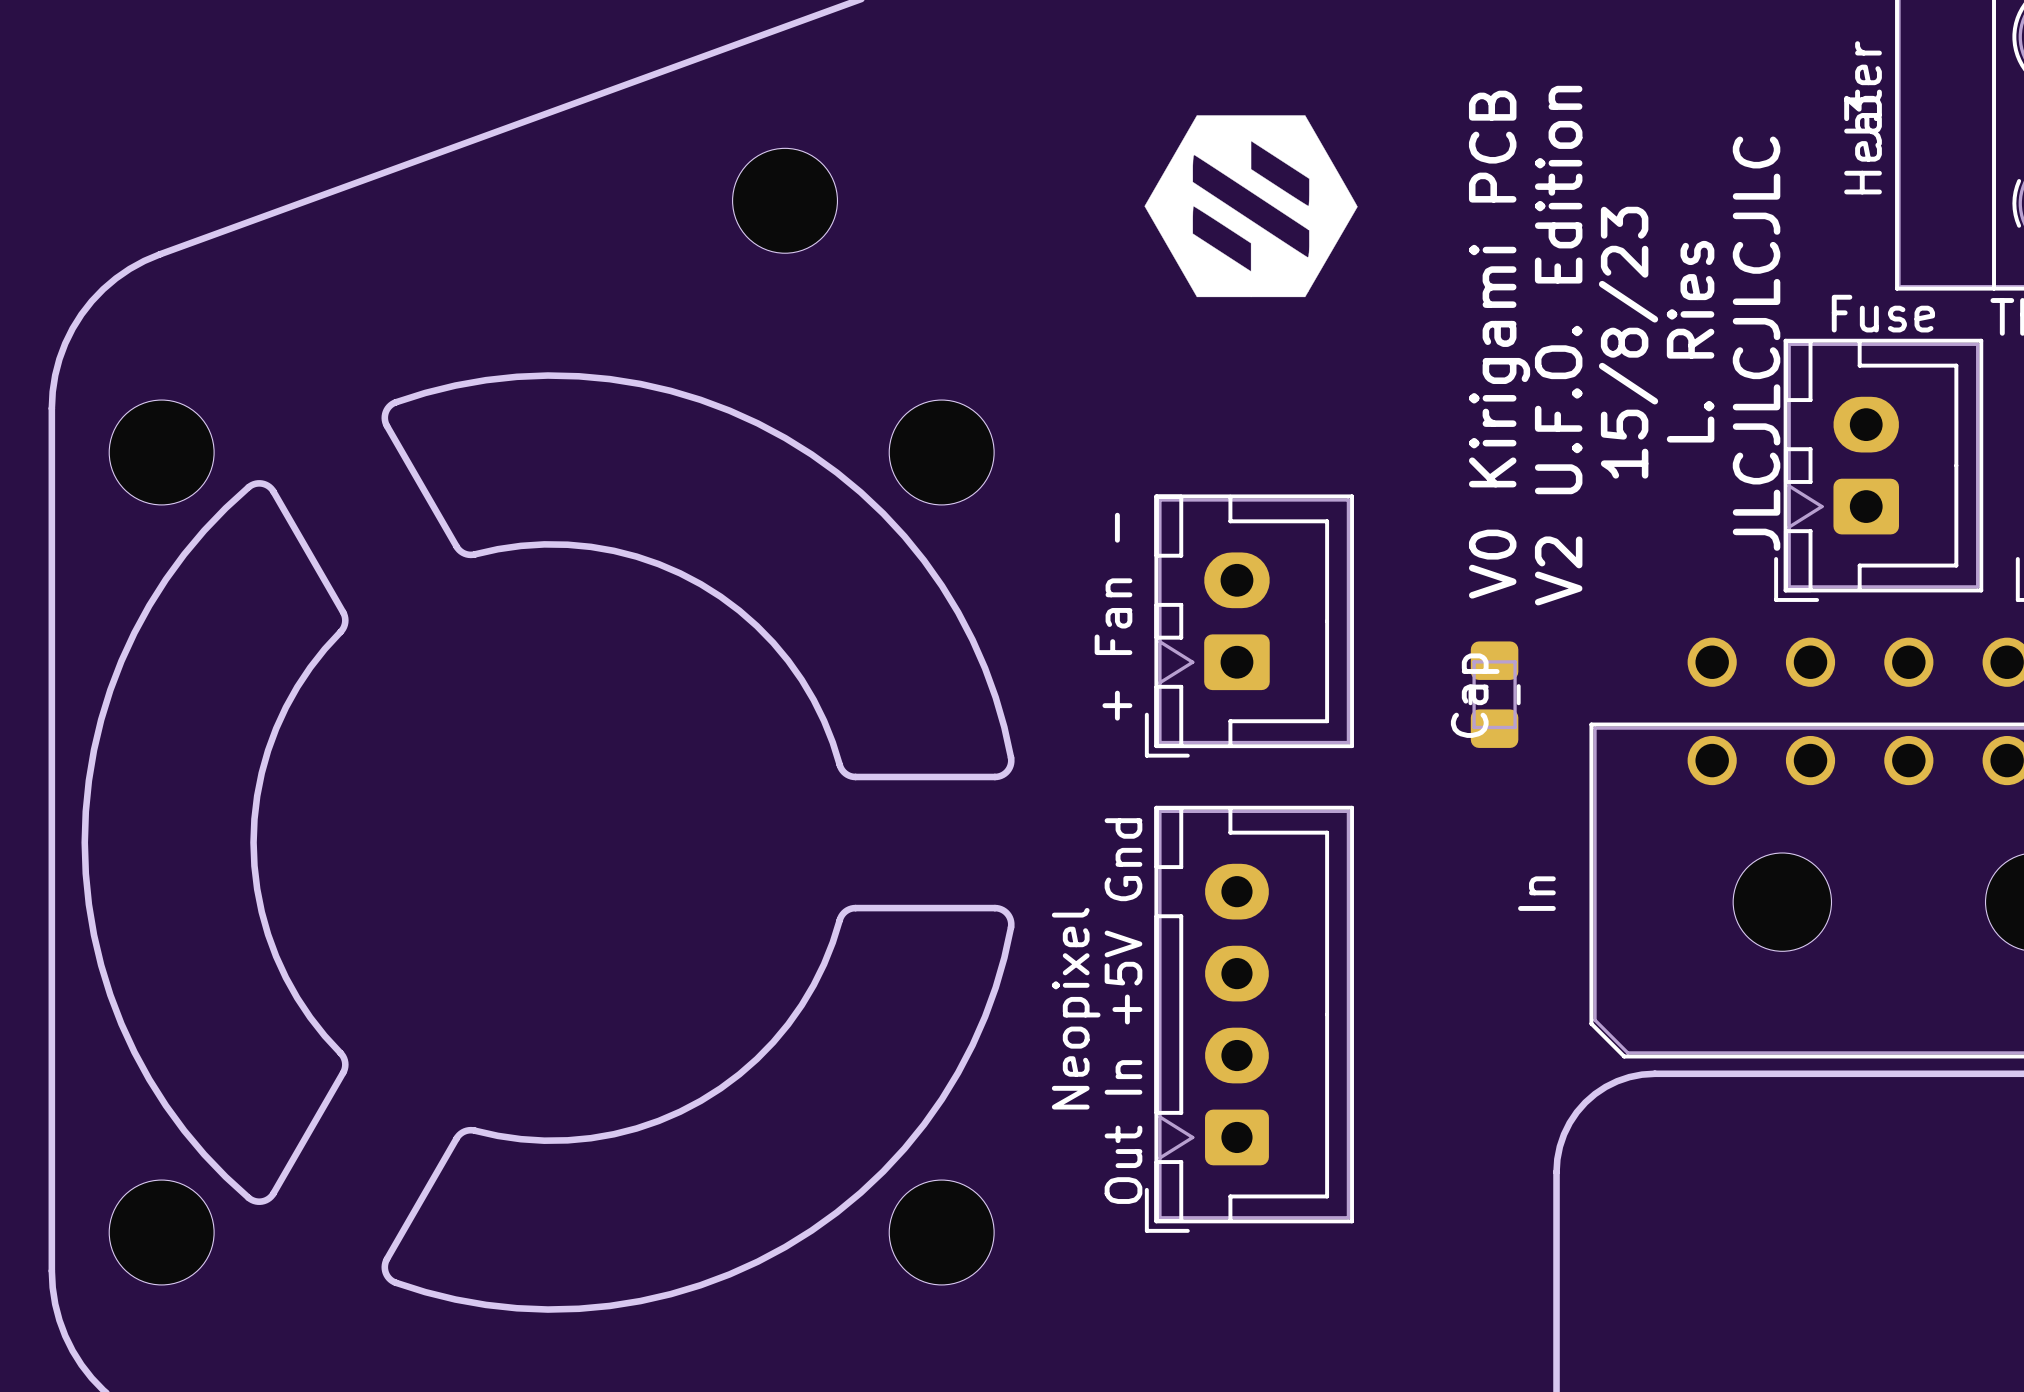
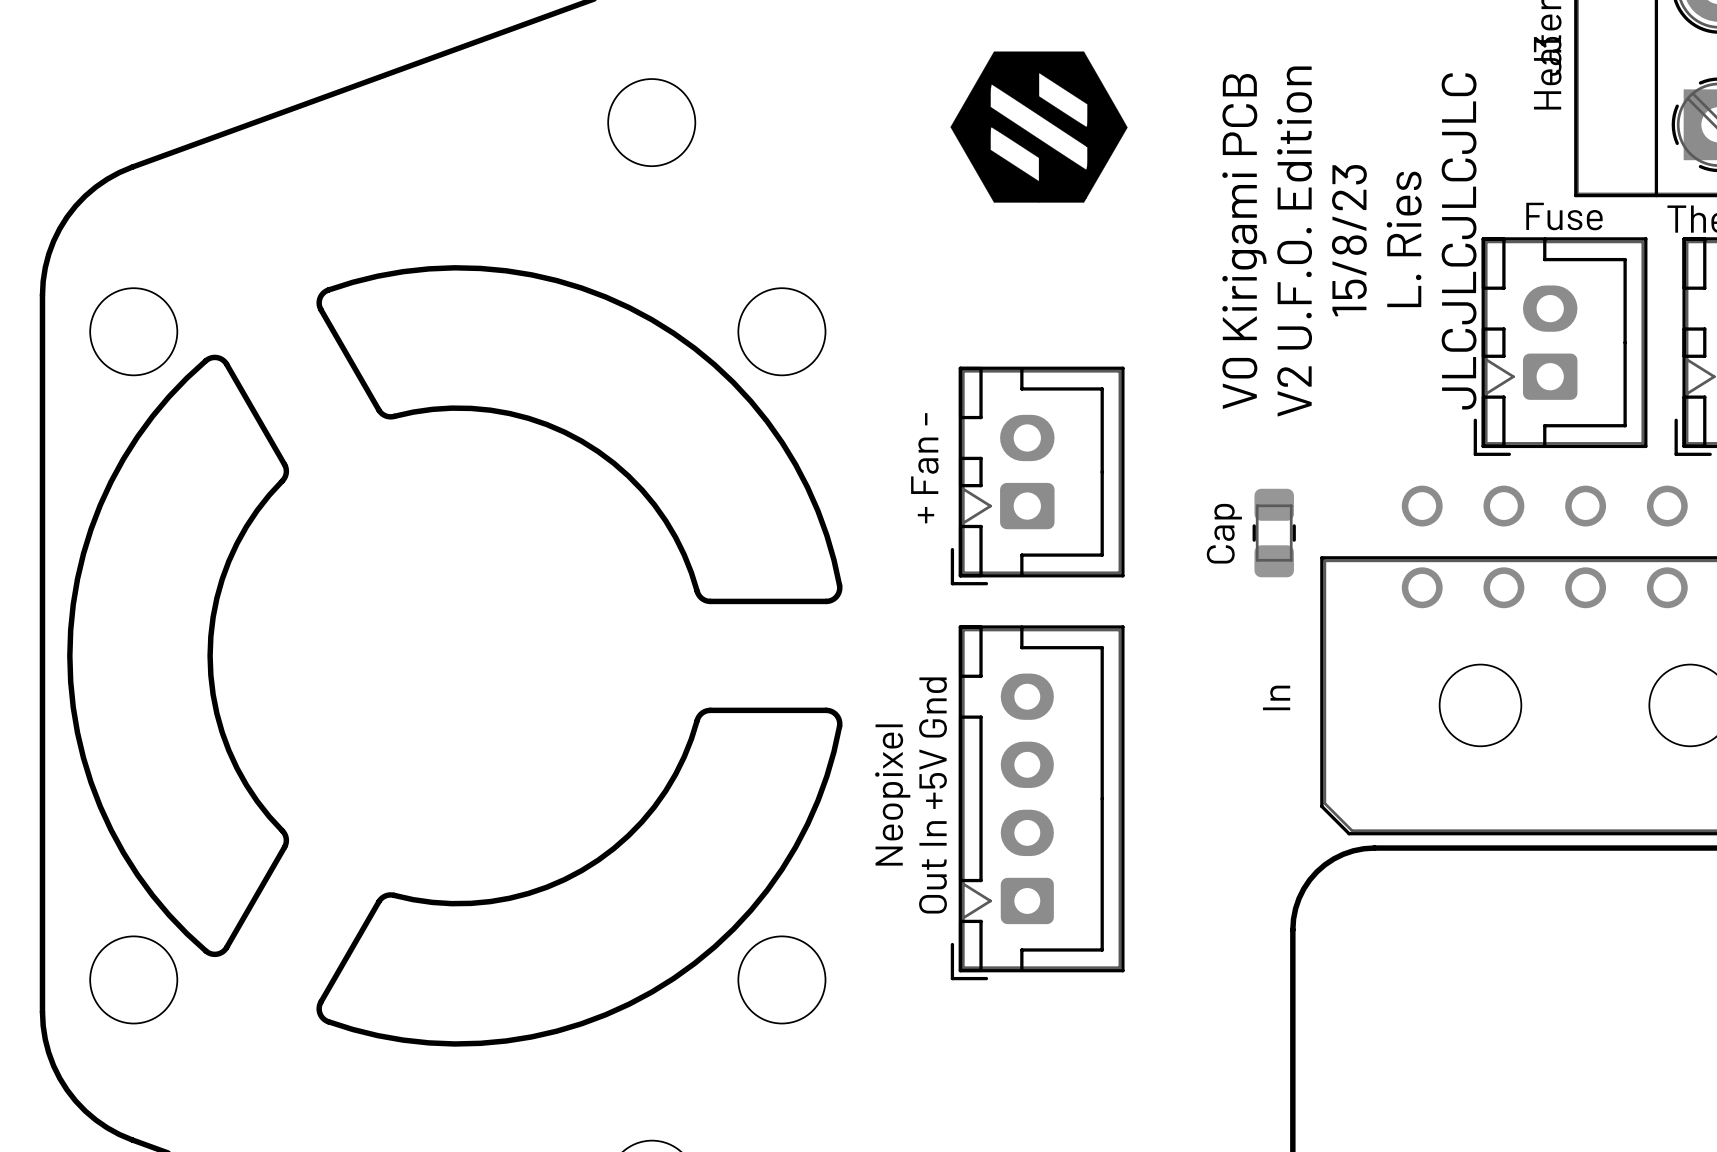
part position: (1494, 694) -> (1274, 533)

